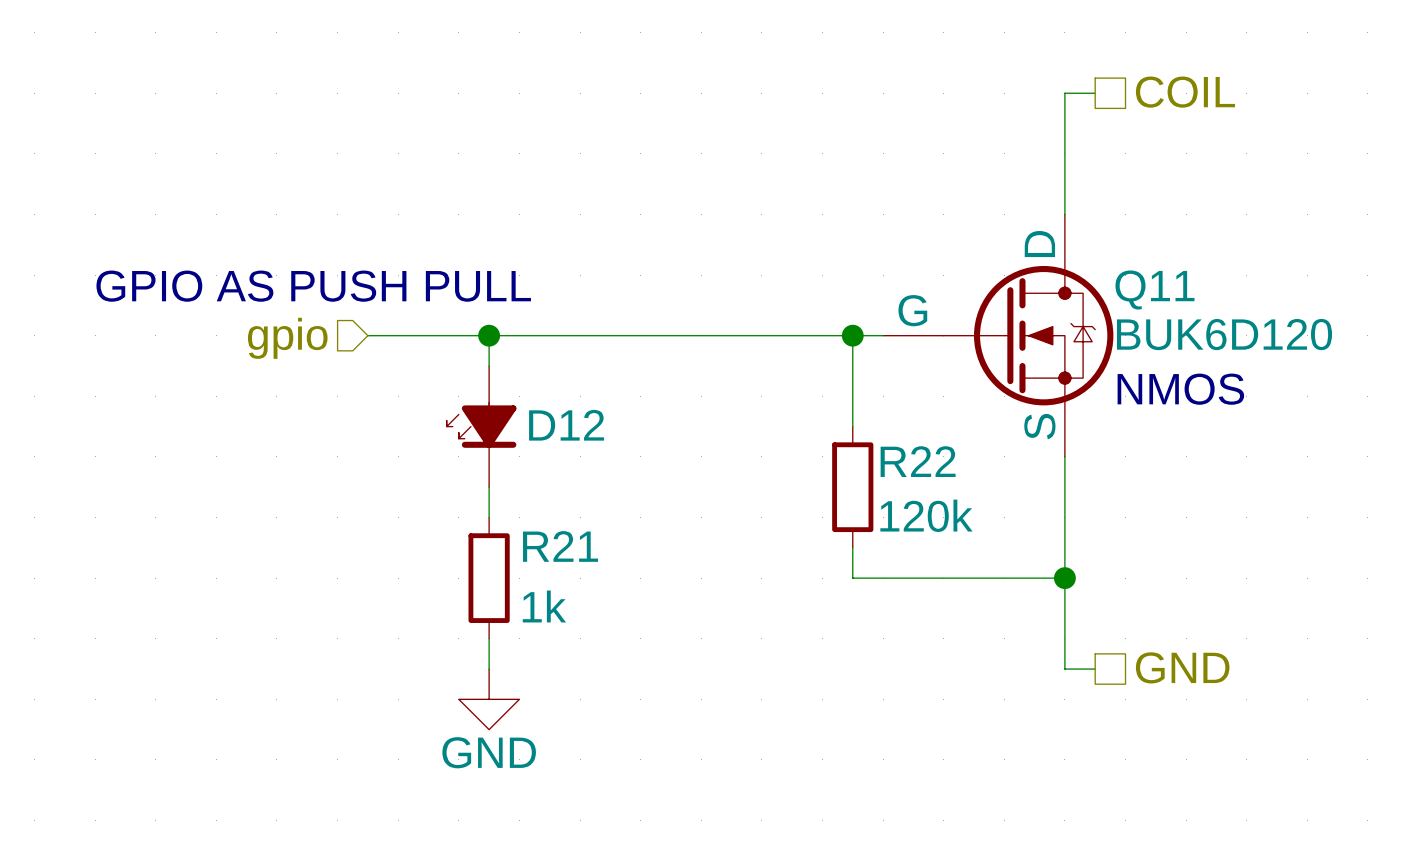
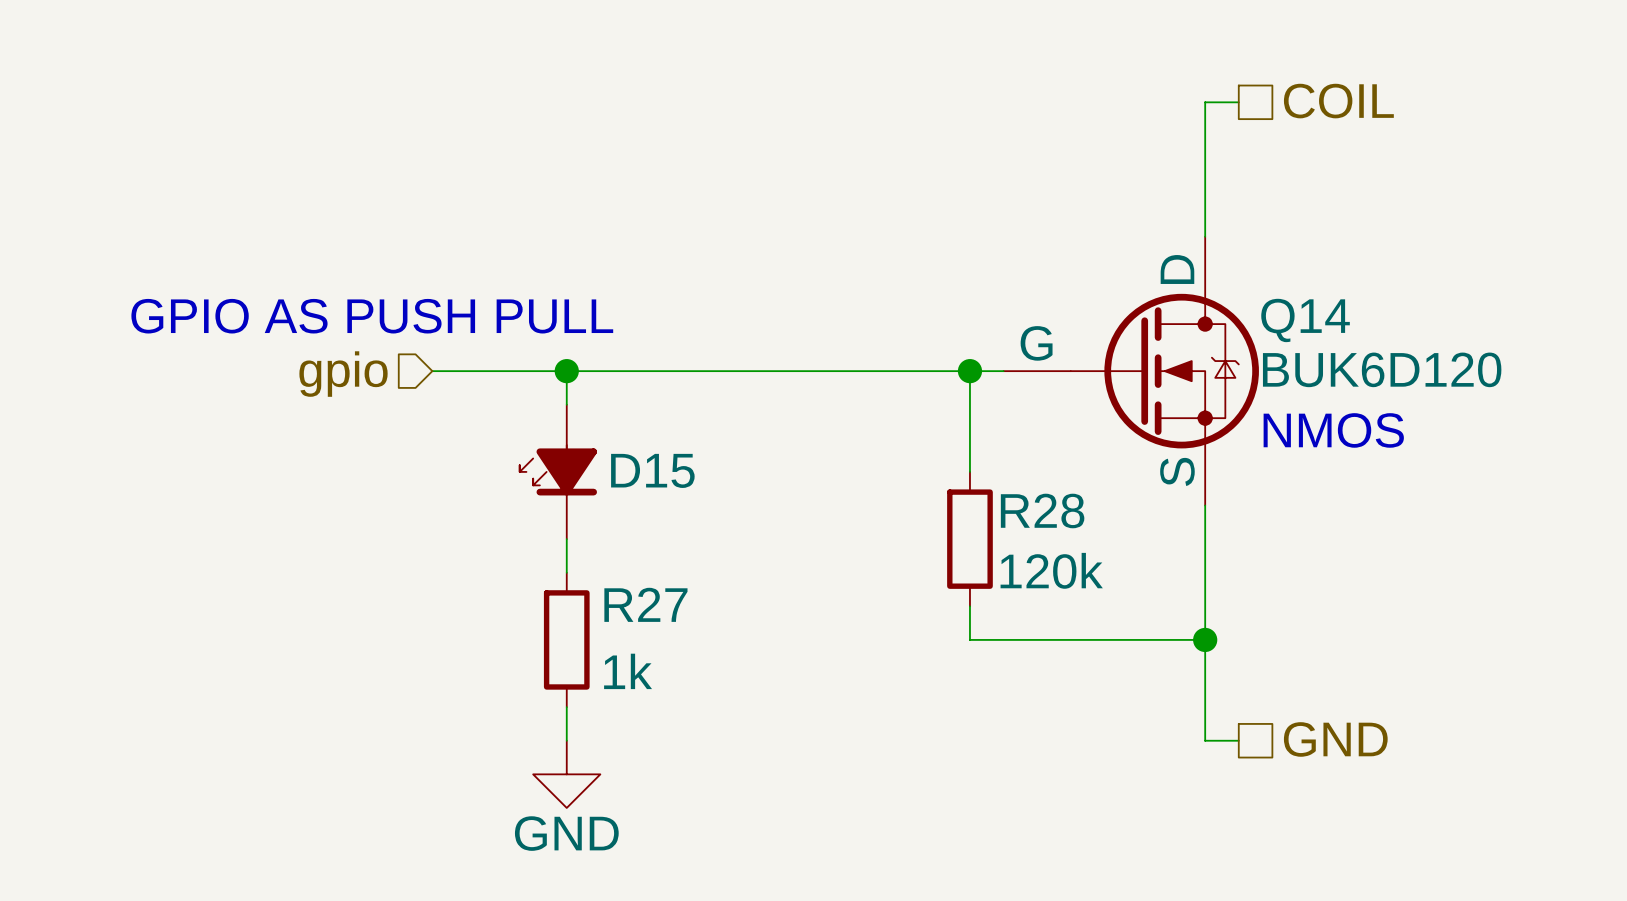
Q11 name: Q11 (1154, 290) -> Q14 (1305, 320)
D12 name: D12 (566, 425) -> D15 (652, 470)
R22 name: R22 (918, 461) -> R28 (1042, 510)
R21 name: R21 (560, 546) -> R27 (645, 604)

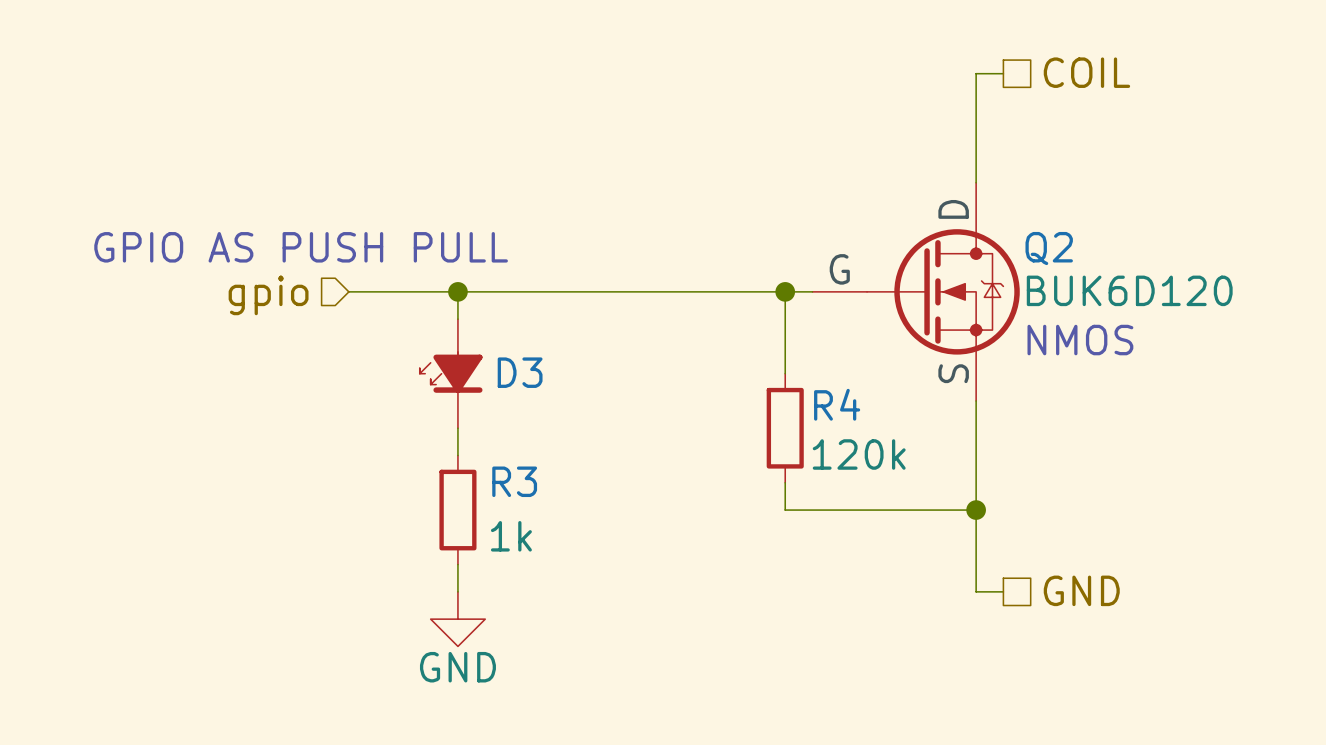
Q14 name: Q14 (1305, 320) -> Q2 (1049, 248)
D15 name: D15 (652, 470) -> D3 (520, 372)
R28 name: R28 (1042, 510) -> R4 (837, 404)
R27 name: R27 (645, 604) -> R3 (514, 481)

